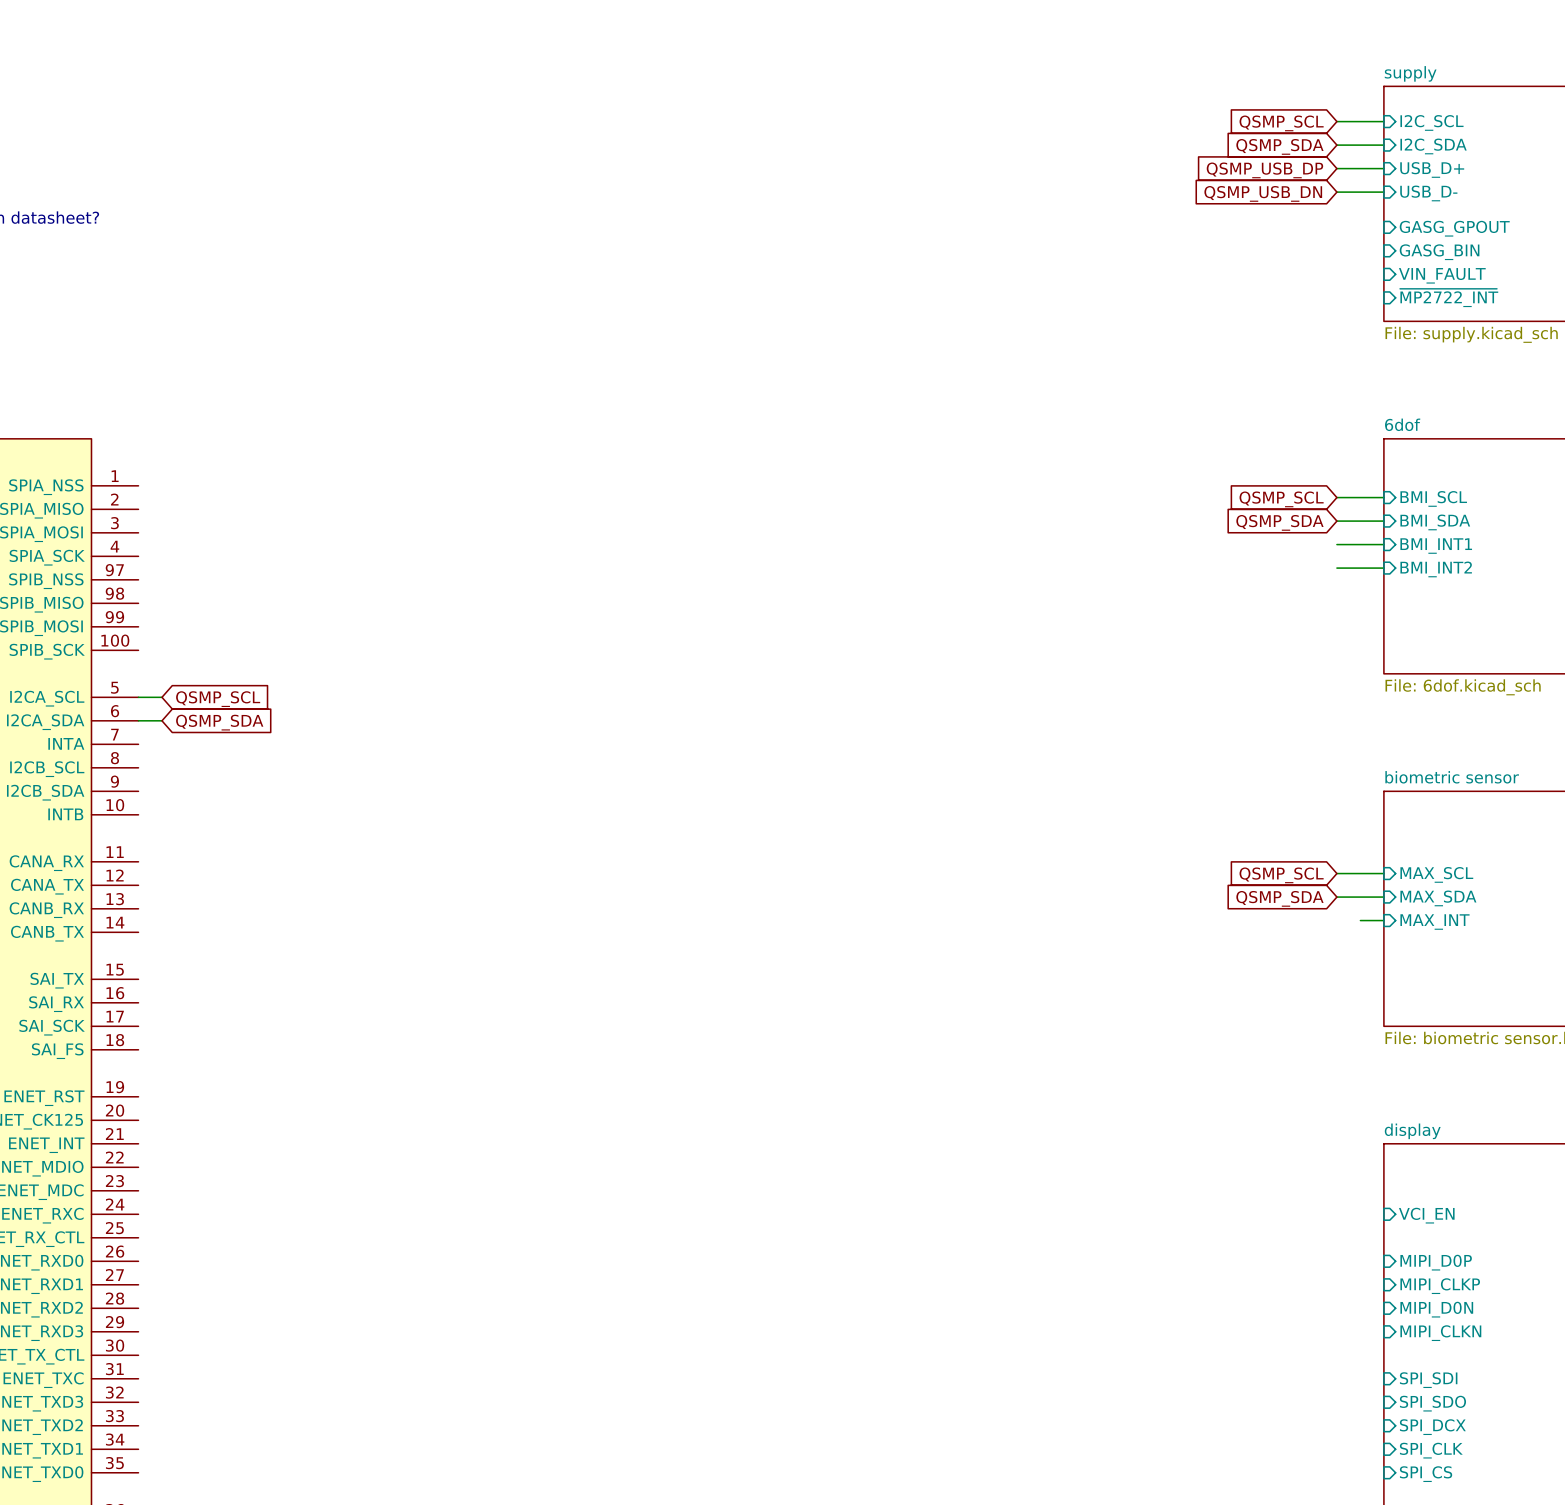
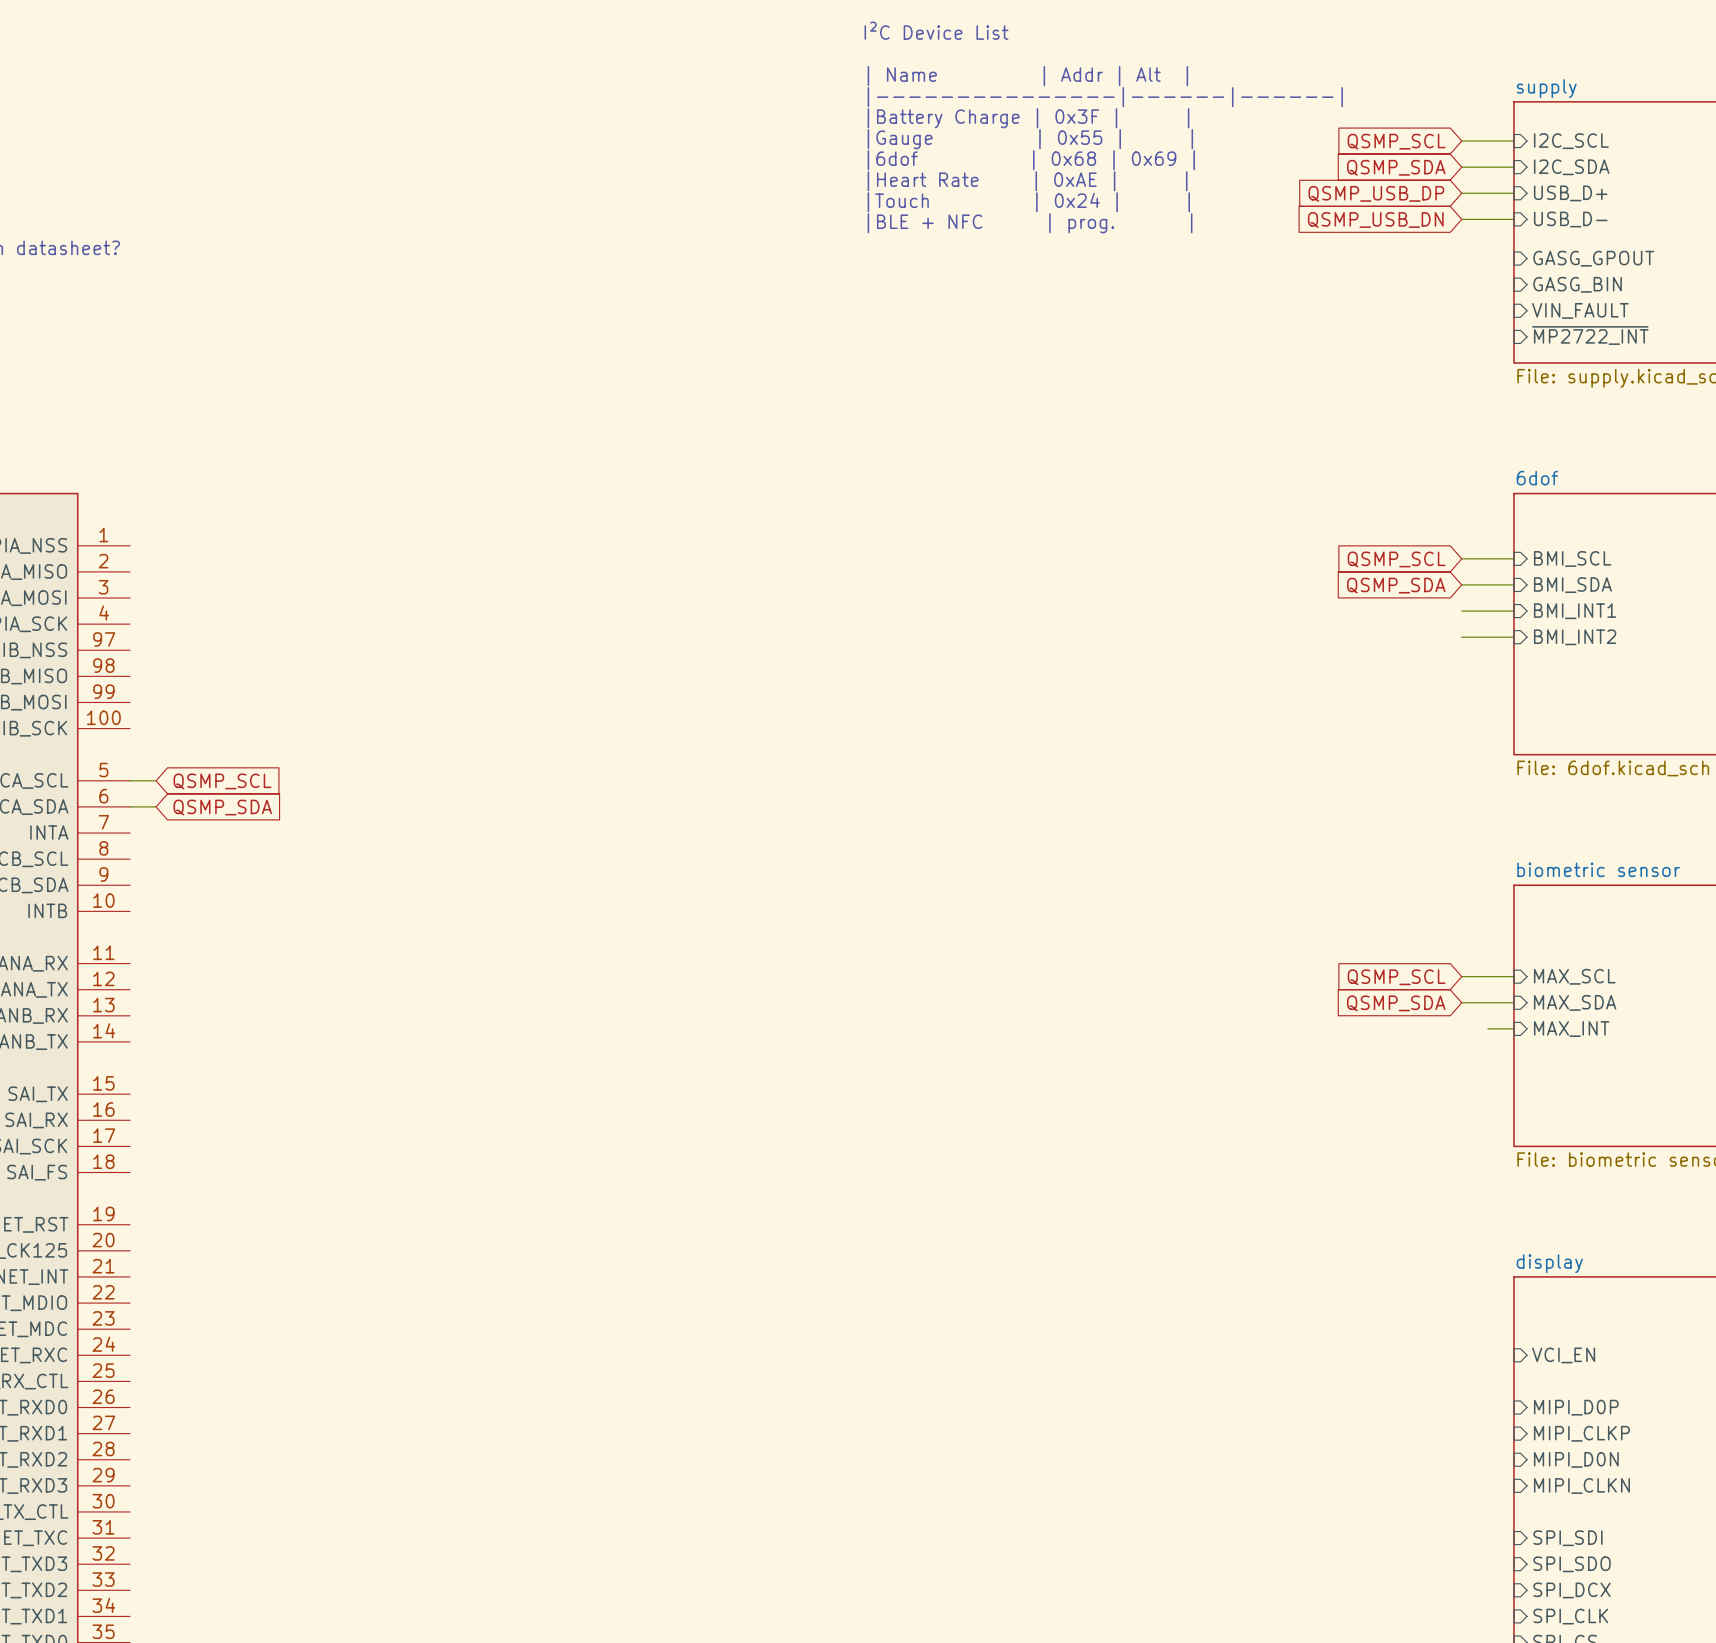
text: none -> I²C Device List (936, 30)
text: none -> | Name | Addr | Alt | (1027, 76)
text: none -> |---------------|------|------| (1105, 97)
text: none -> |Battery Charge | 0x3F | | (1028, 118)
text: none -> |Gauge | 0x55 | | (1030, 139)
text: none -> |6dof | 0x68 | 0x69 | (1031, 160)
text: none -> |Heart Rate | 0xAE | | (1027, 181)
text: none -> |Touch | 0x24 | | (1028, 202)
text: none -> |BLE + NFC | prog. | (1030, 223)

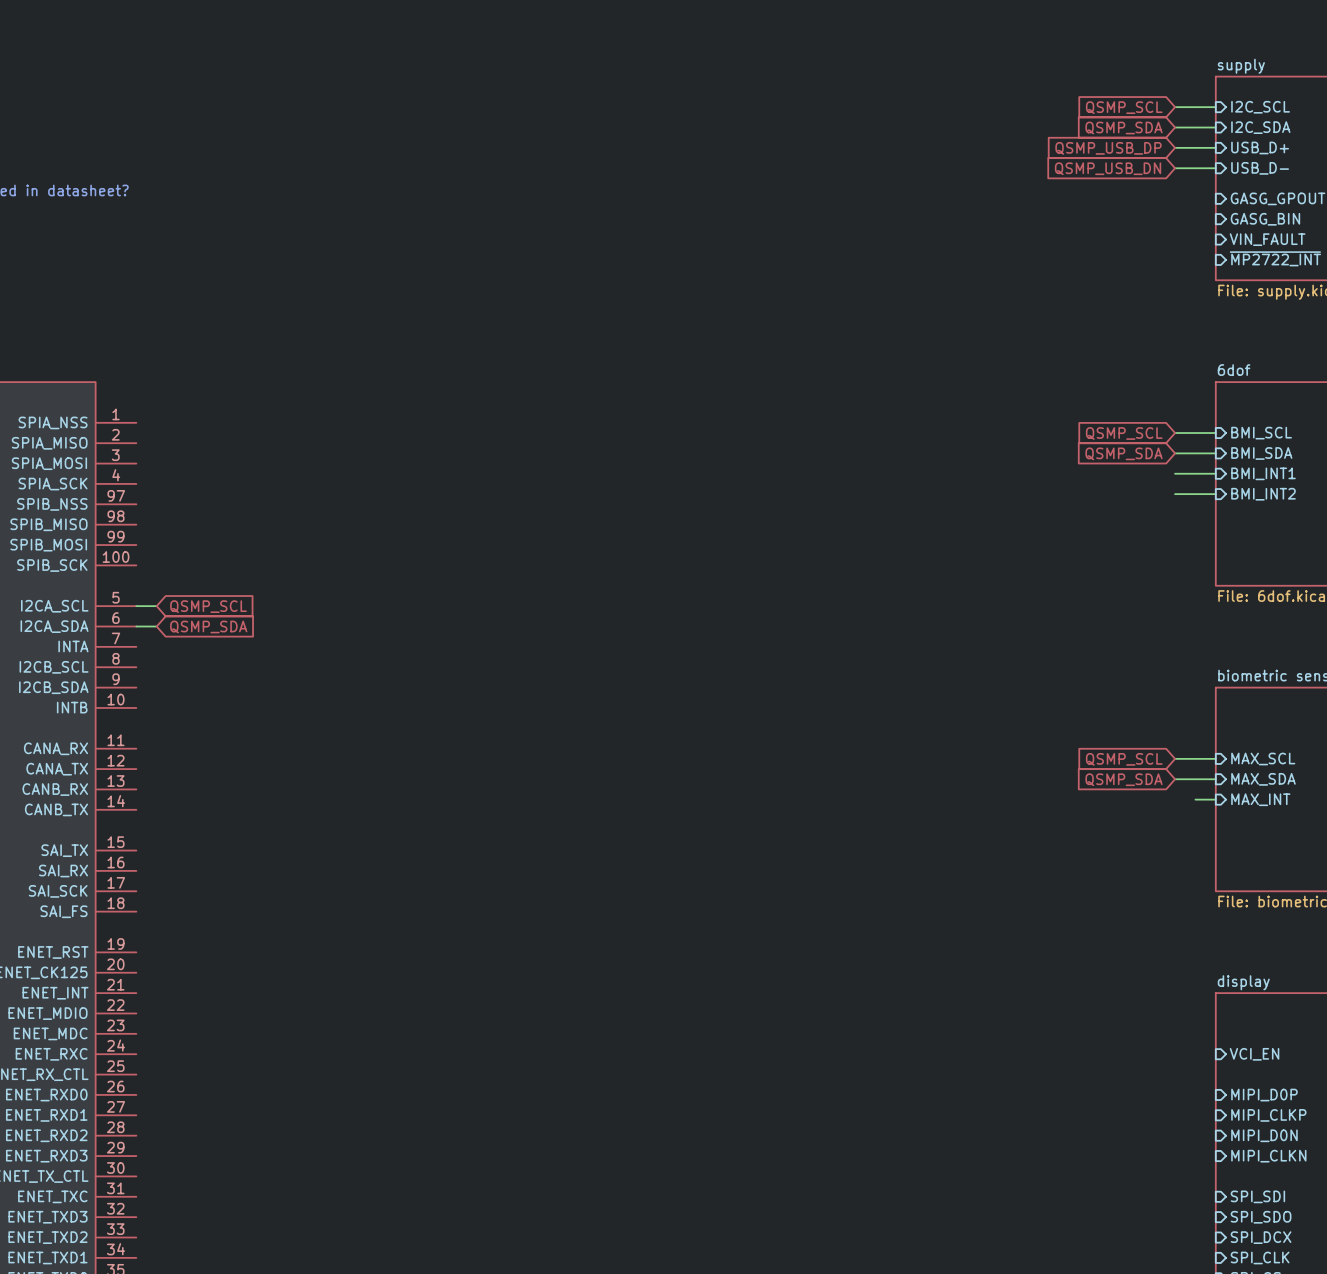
text: I²C Device List (936, 30) -> none
text: | Name | Addr | Alt | (1027, 76) -> none
text: |---------------|------|------| (1105, 97) -> none
text: |Battery Charge | 0x3F | | (1028, 118) -> none
text: |Gauge | 0x55 | | (1030, 139) -> none
text: |6dof | 0x68 | 0x69 | (1031, 160) -> none
text: |Heart Rate | 0xAE | | (1027, 181) -> none
text: |Touch | 0x24 | | (1028, 202) -> none
text: |BLE + NFC | prog. | (1030, 223) -> none

